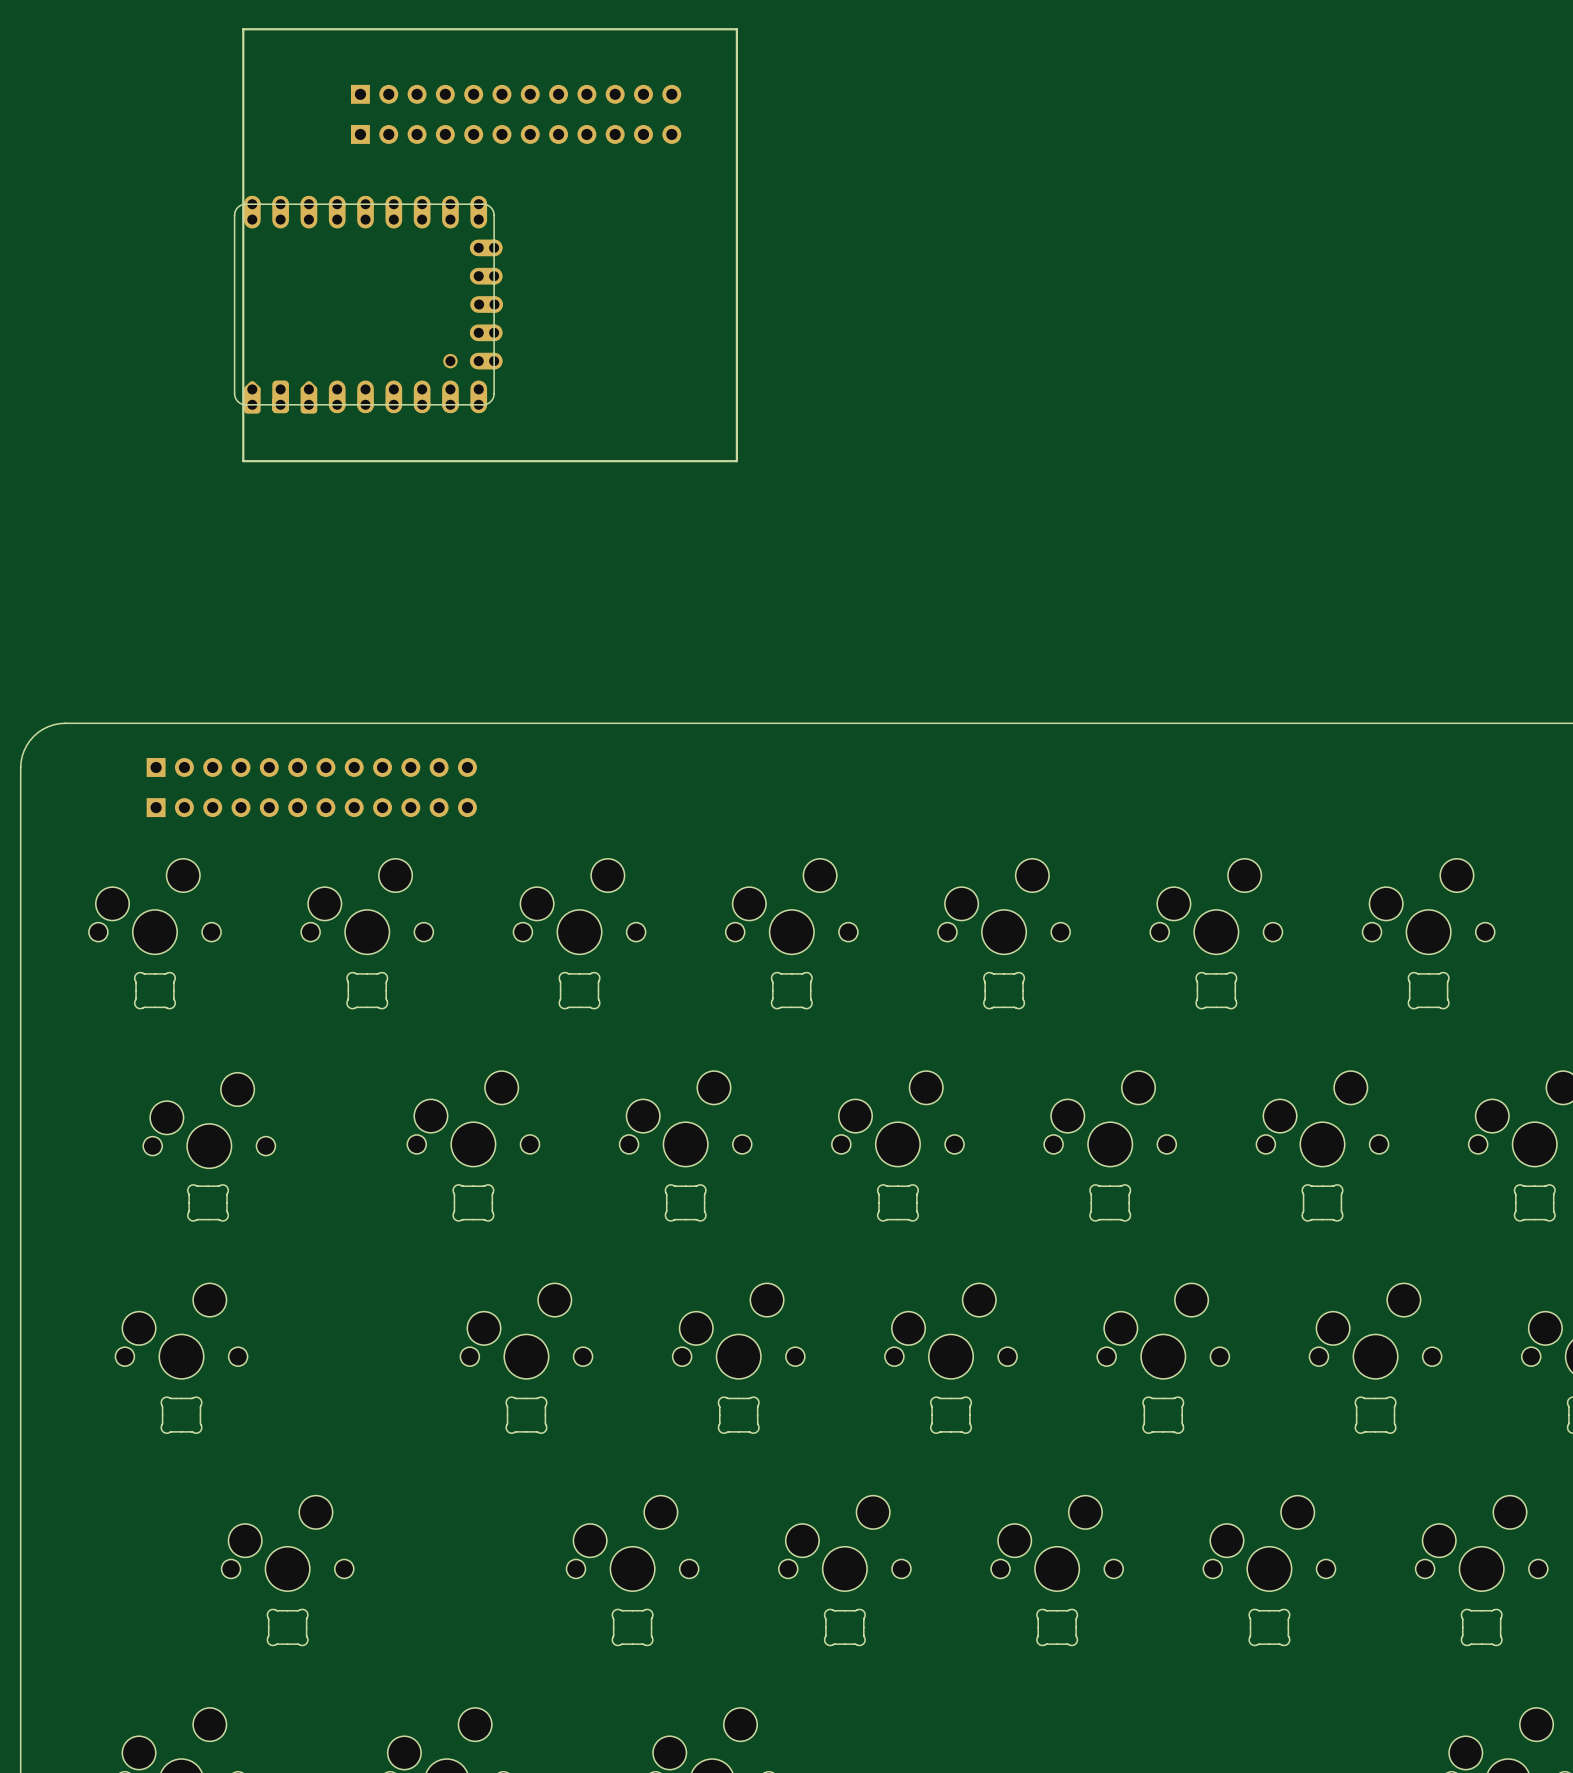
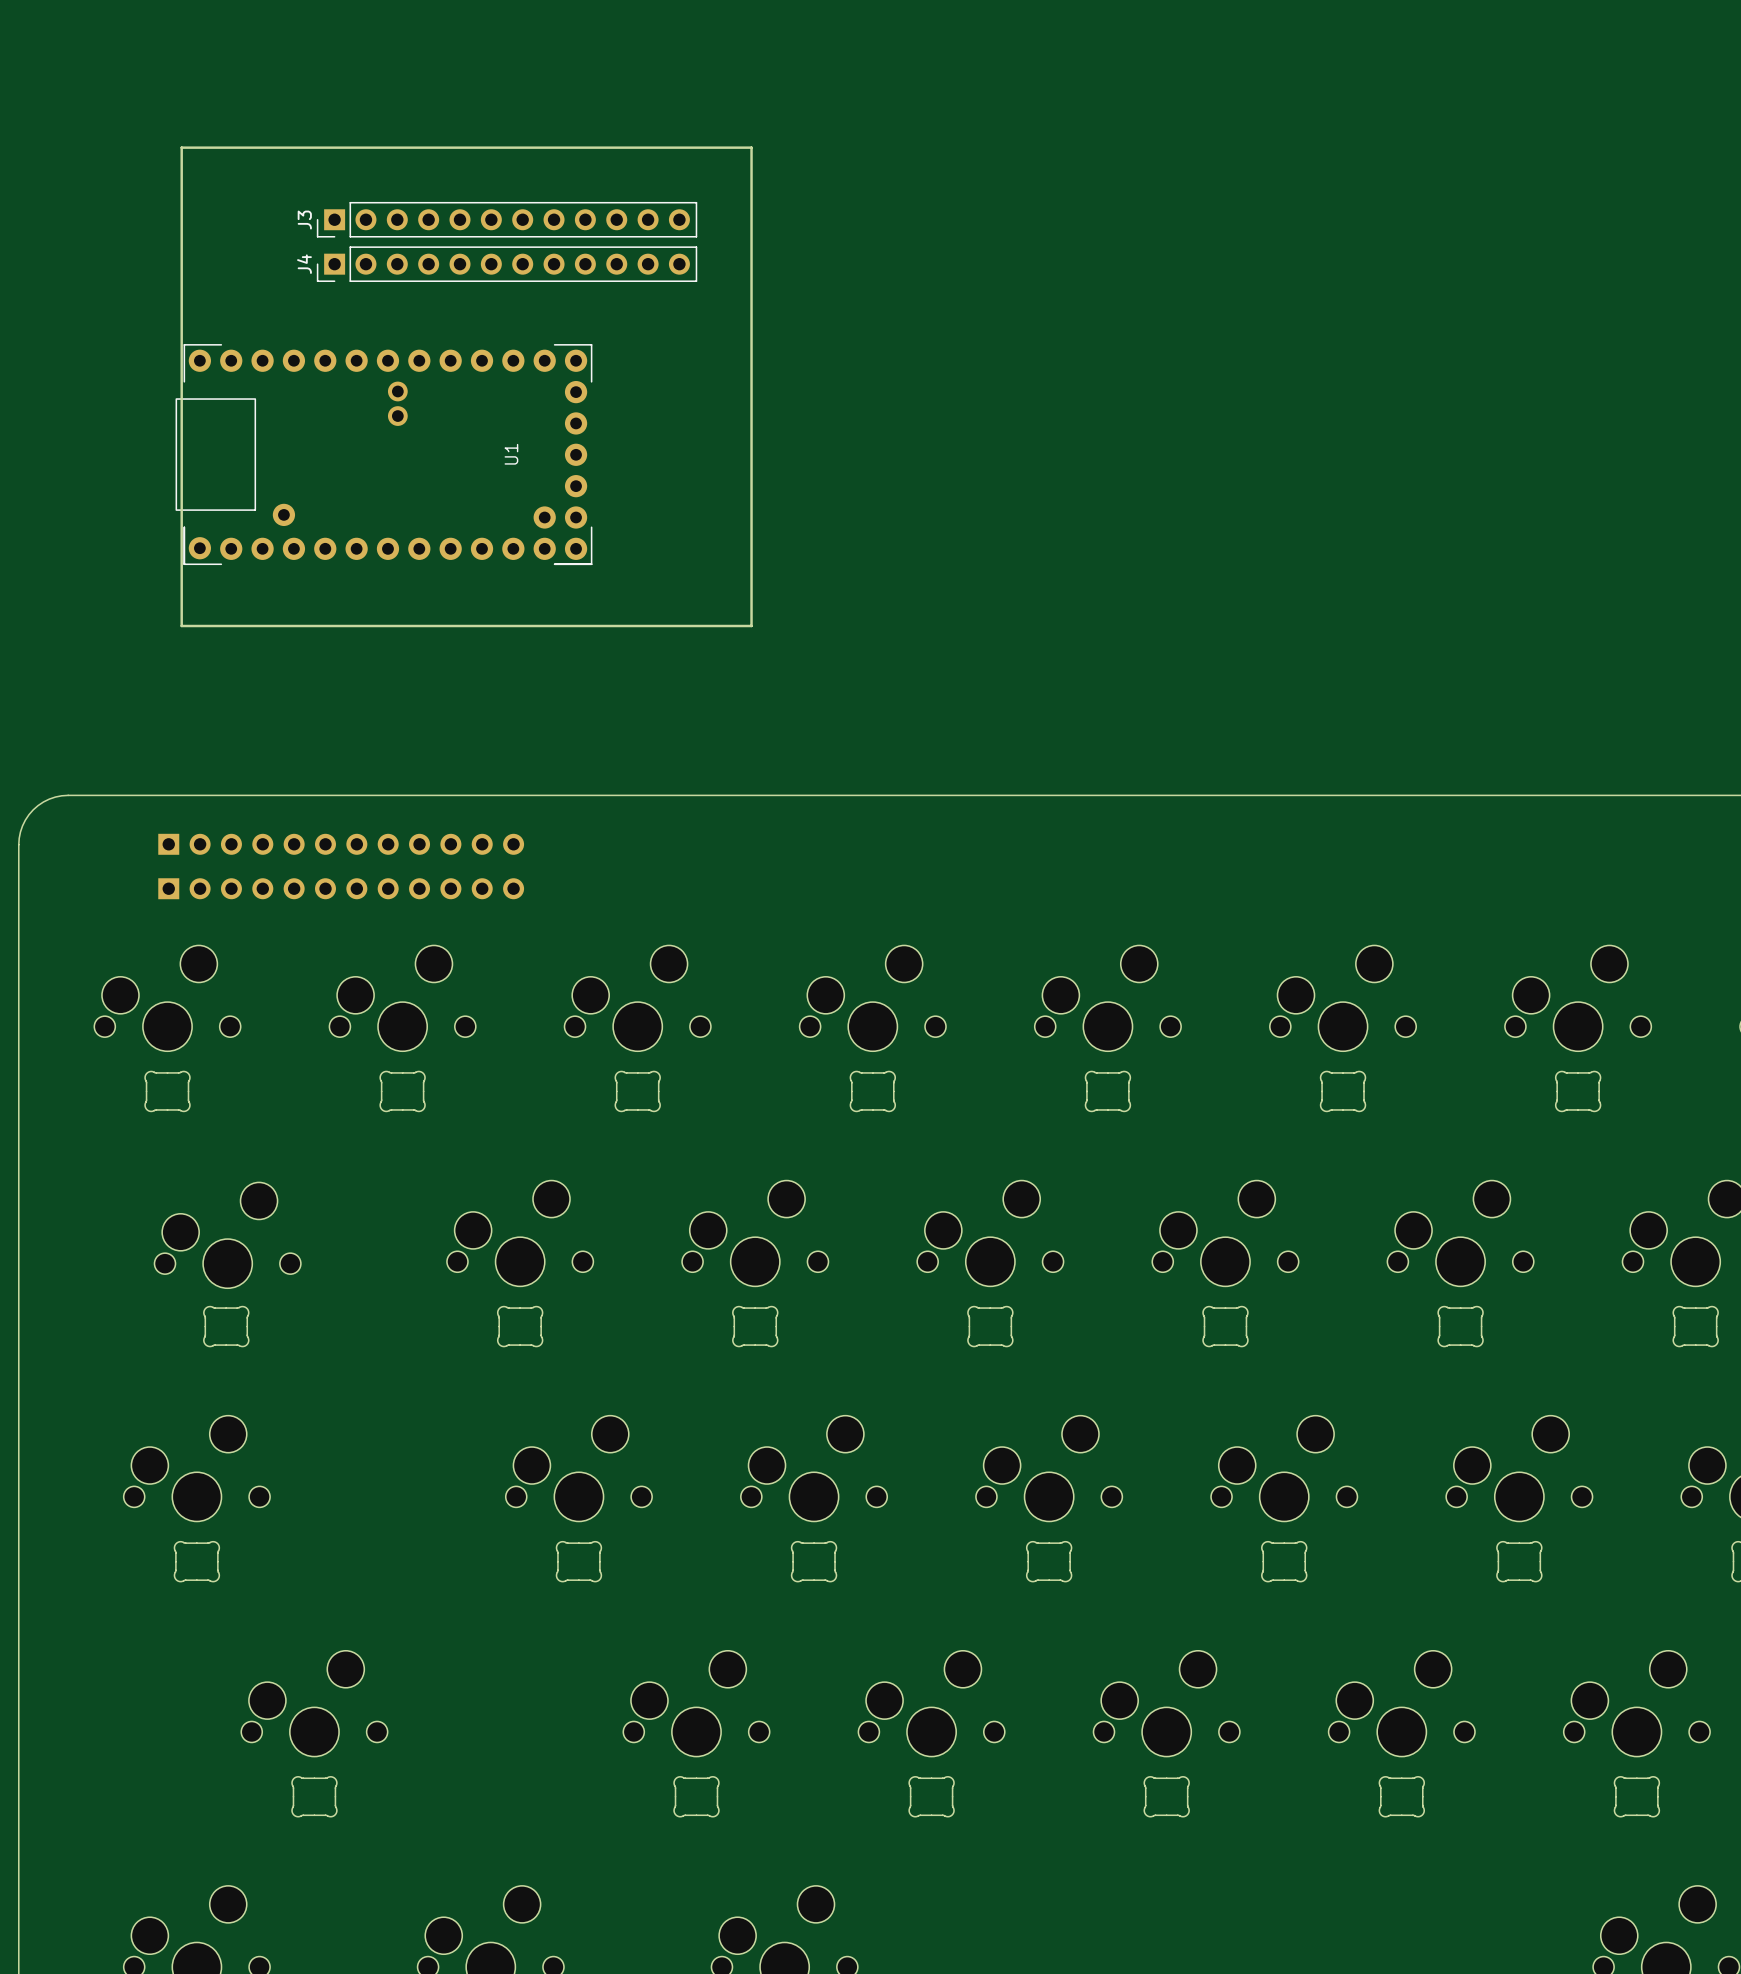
board edge: (243, 29) (736, 29) (736, 461) (243, 461) (243, 29) -> none
J3 side: bottom (516, 94) -> top (507, 219)
J4 side: bottom (516, 134) -> top (507, 264)
board edge: none -> (181, 147) (751, 147) (751, 626) (181, 626) (181, 147)
part: (368, 304) -> none
U1: none -> (383, 454)

